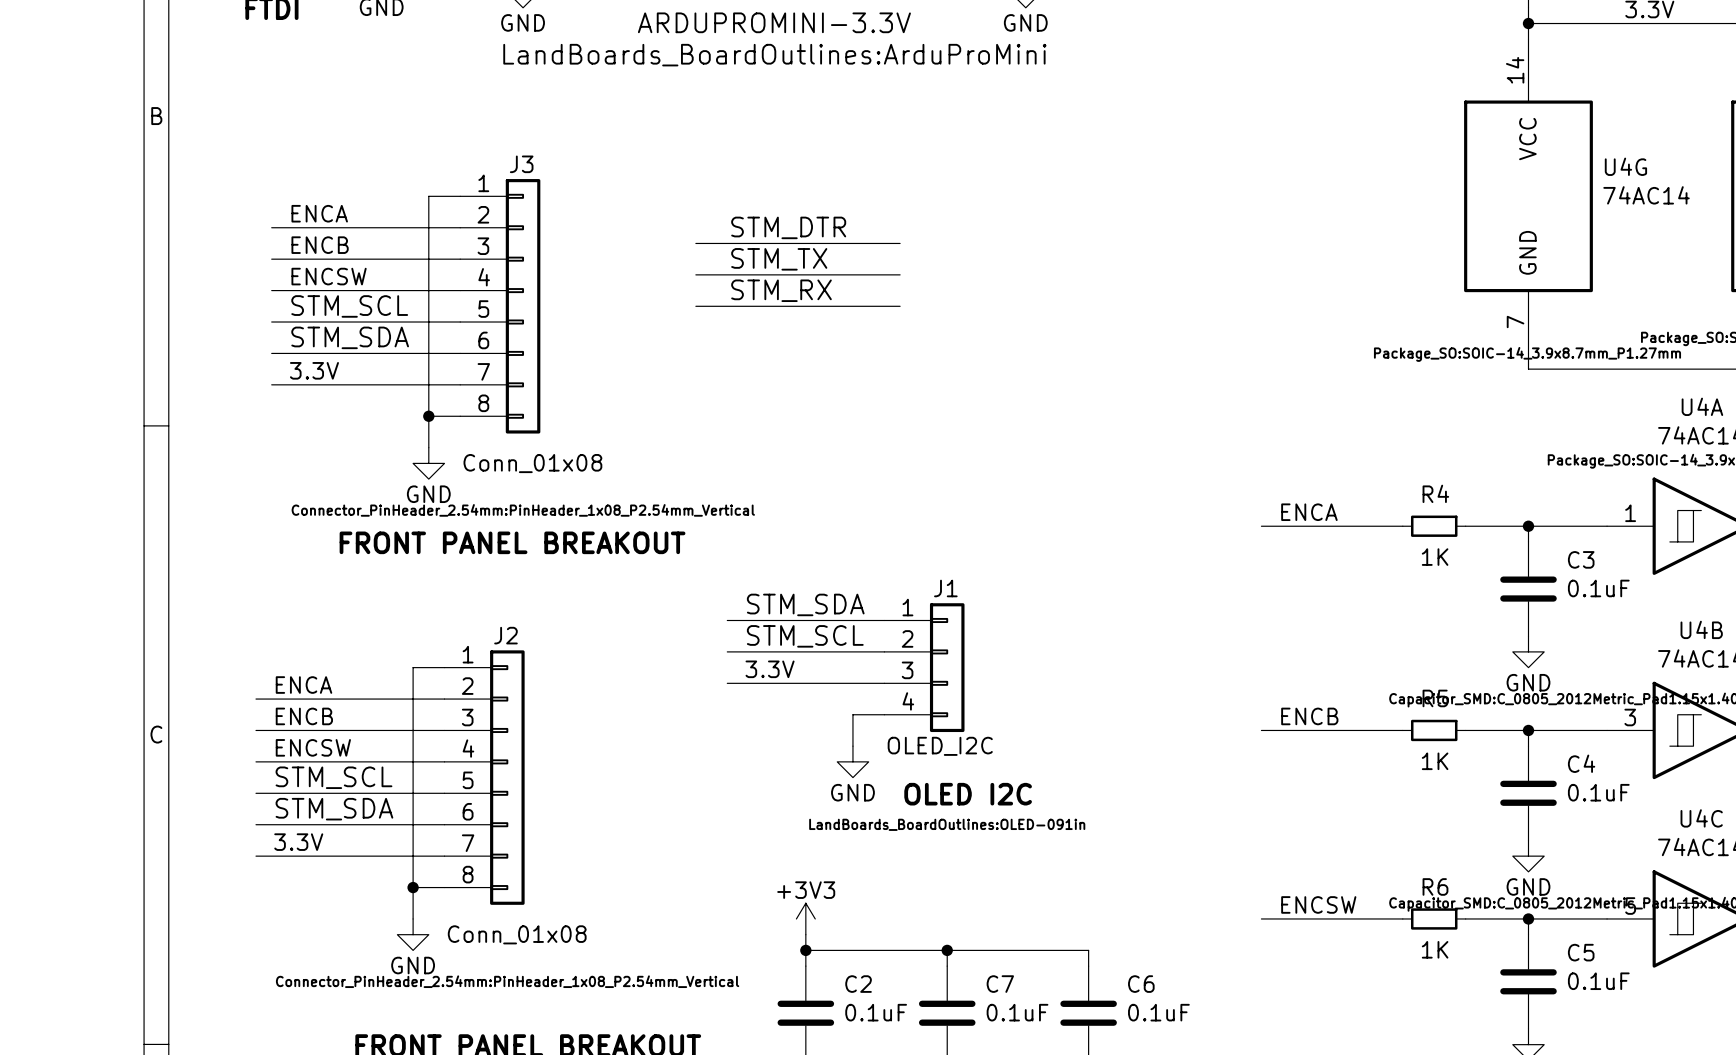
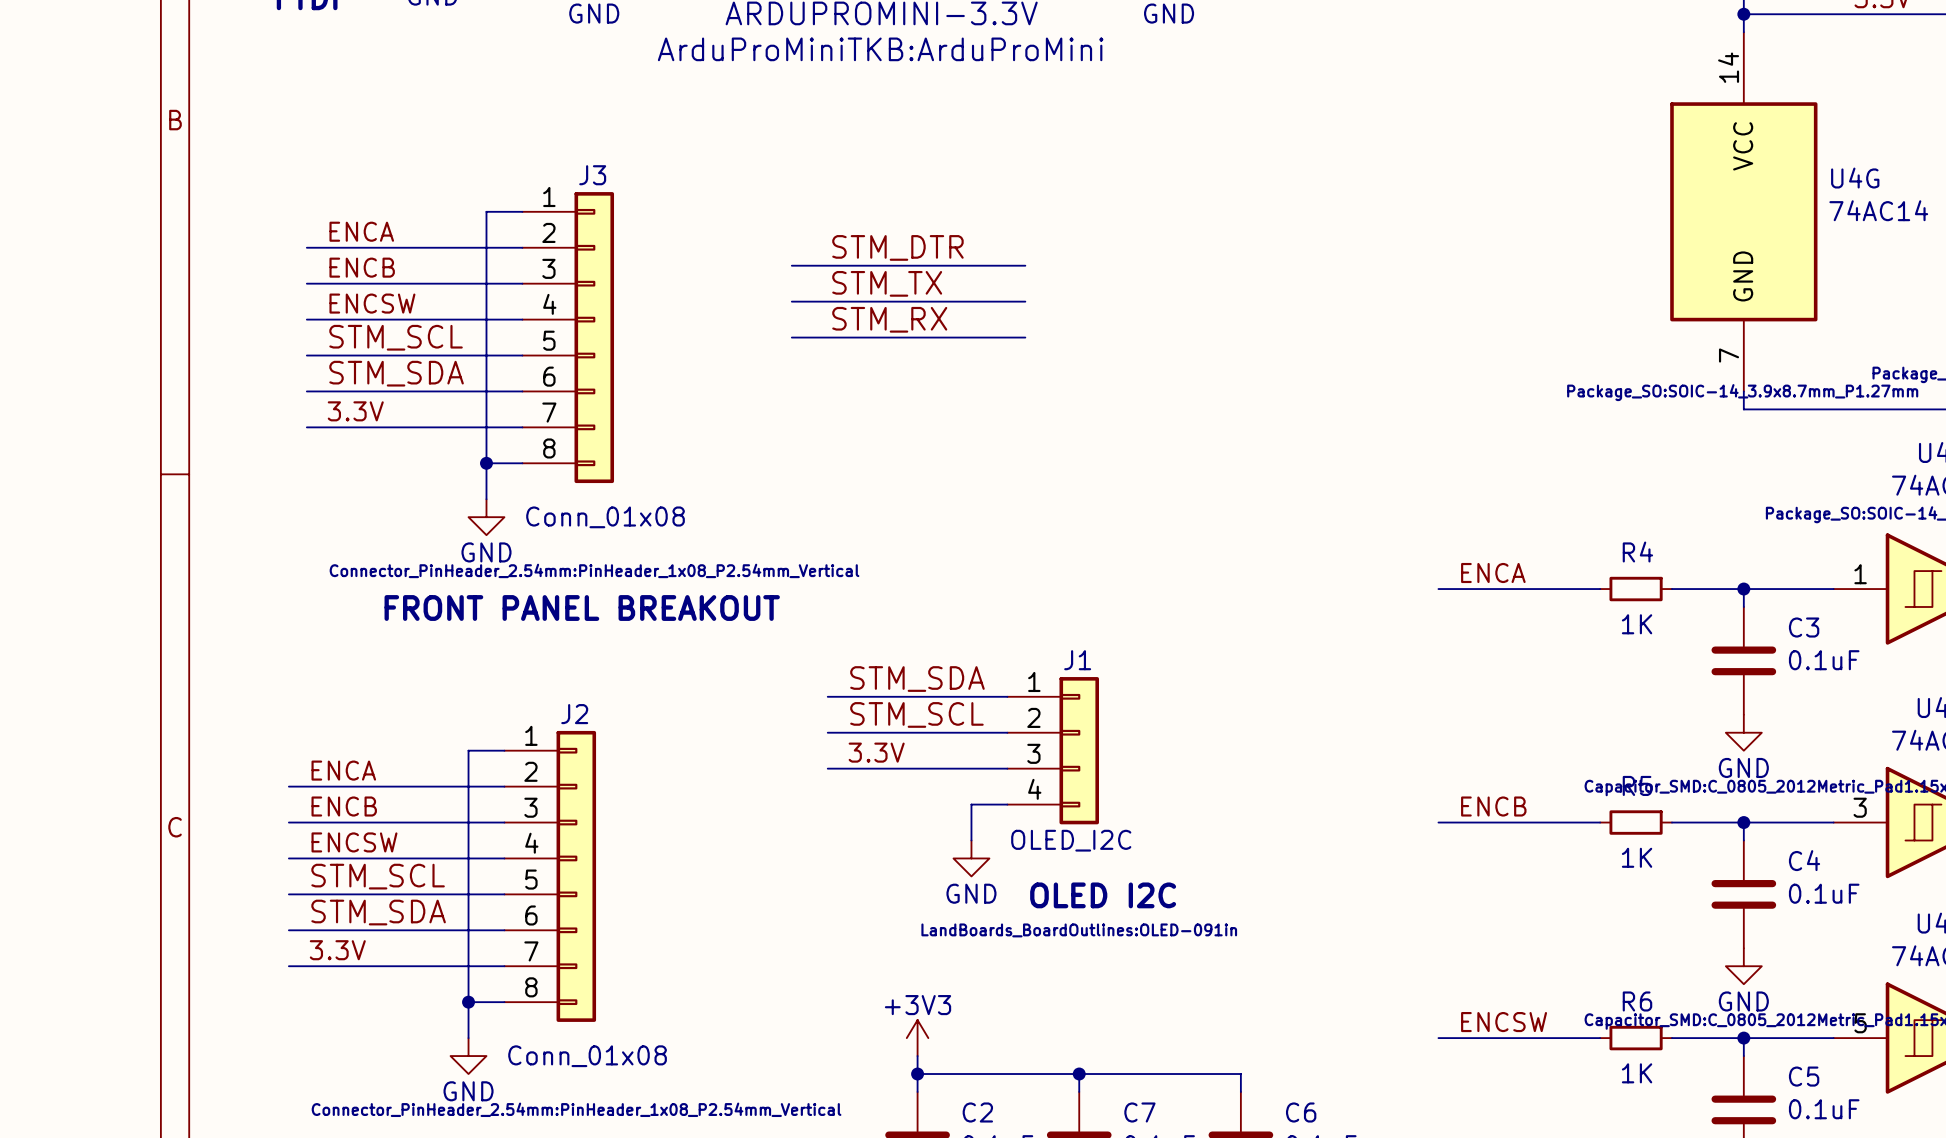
part text: LandBoards_BoardOutlines:ArduProMini (774, 55) -> ArduProMiniTKB:ArduProMini (880, 49)

